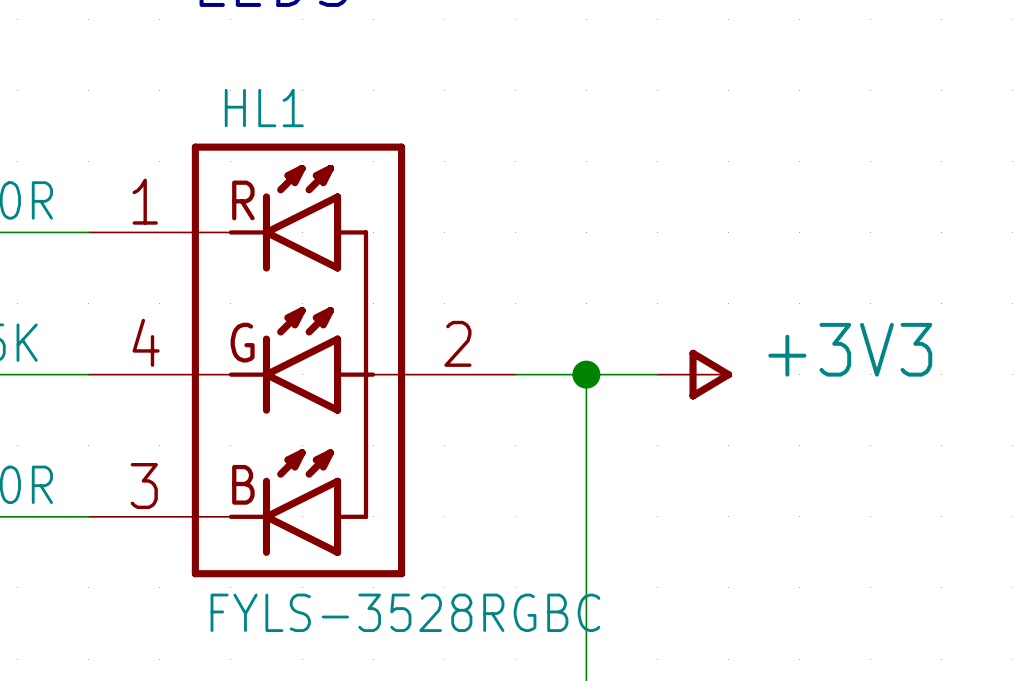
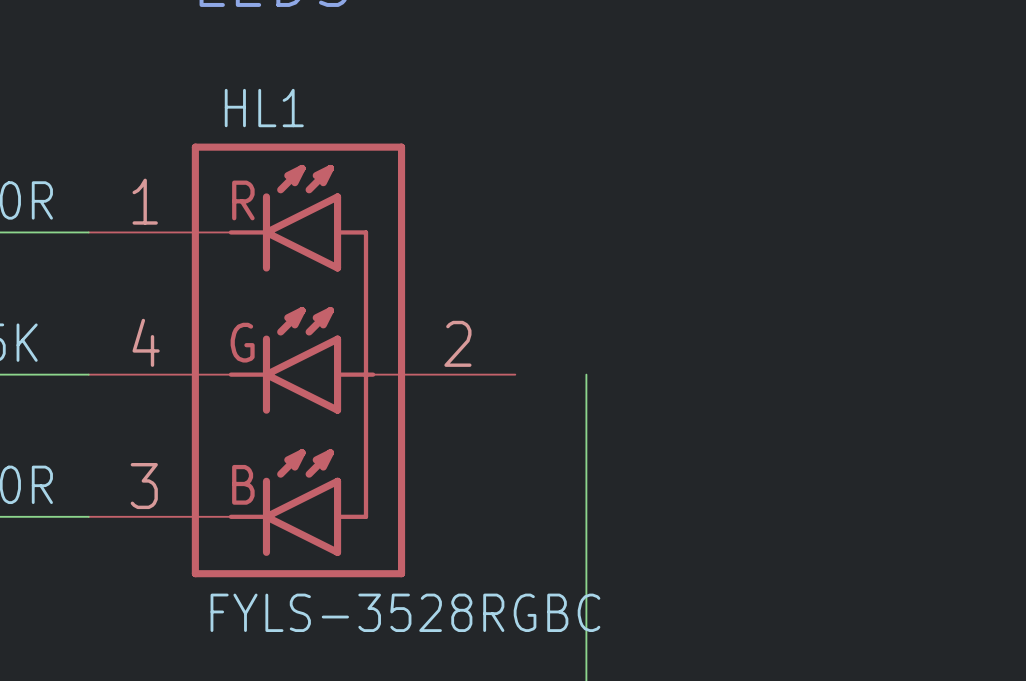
wire: (515, 374) (657, 374) -> none
junction: (586, 374) -> none
power symbol: +3V3 (694, 374) -> none

